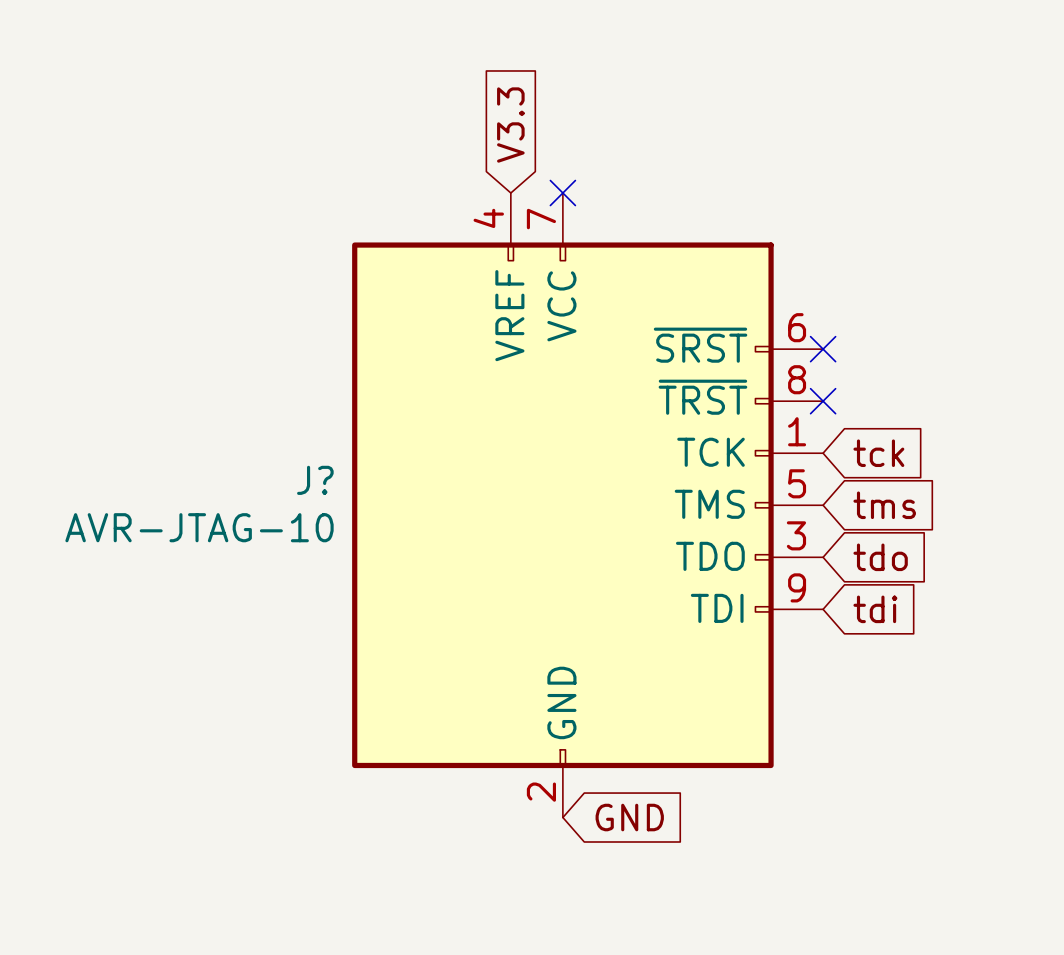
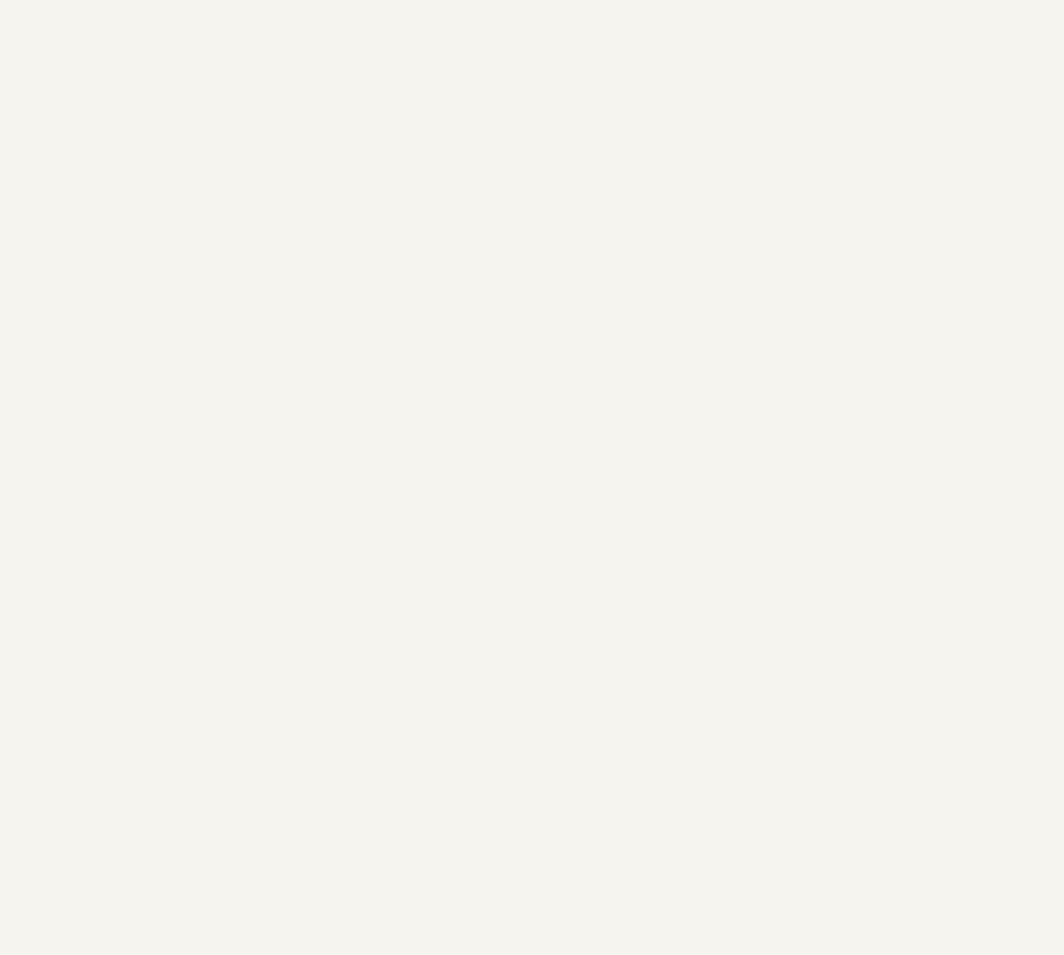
global label: V3.3 (510, 125) -> none
no-connect mark: (562, 193) -> none
no-connect mark: (823, 349) -> none
no-connect mark: (823, 401) -> none
global label: tck (878, 453) -> none
J?: AVR-JTAG-10 (587, 505) -> none
global label: tms (884, 505) -> none
global label: tdo (880, 557) -> none
global label: tdi (875, 609) -> none
global label: GND (629, 817) -> none

